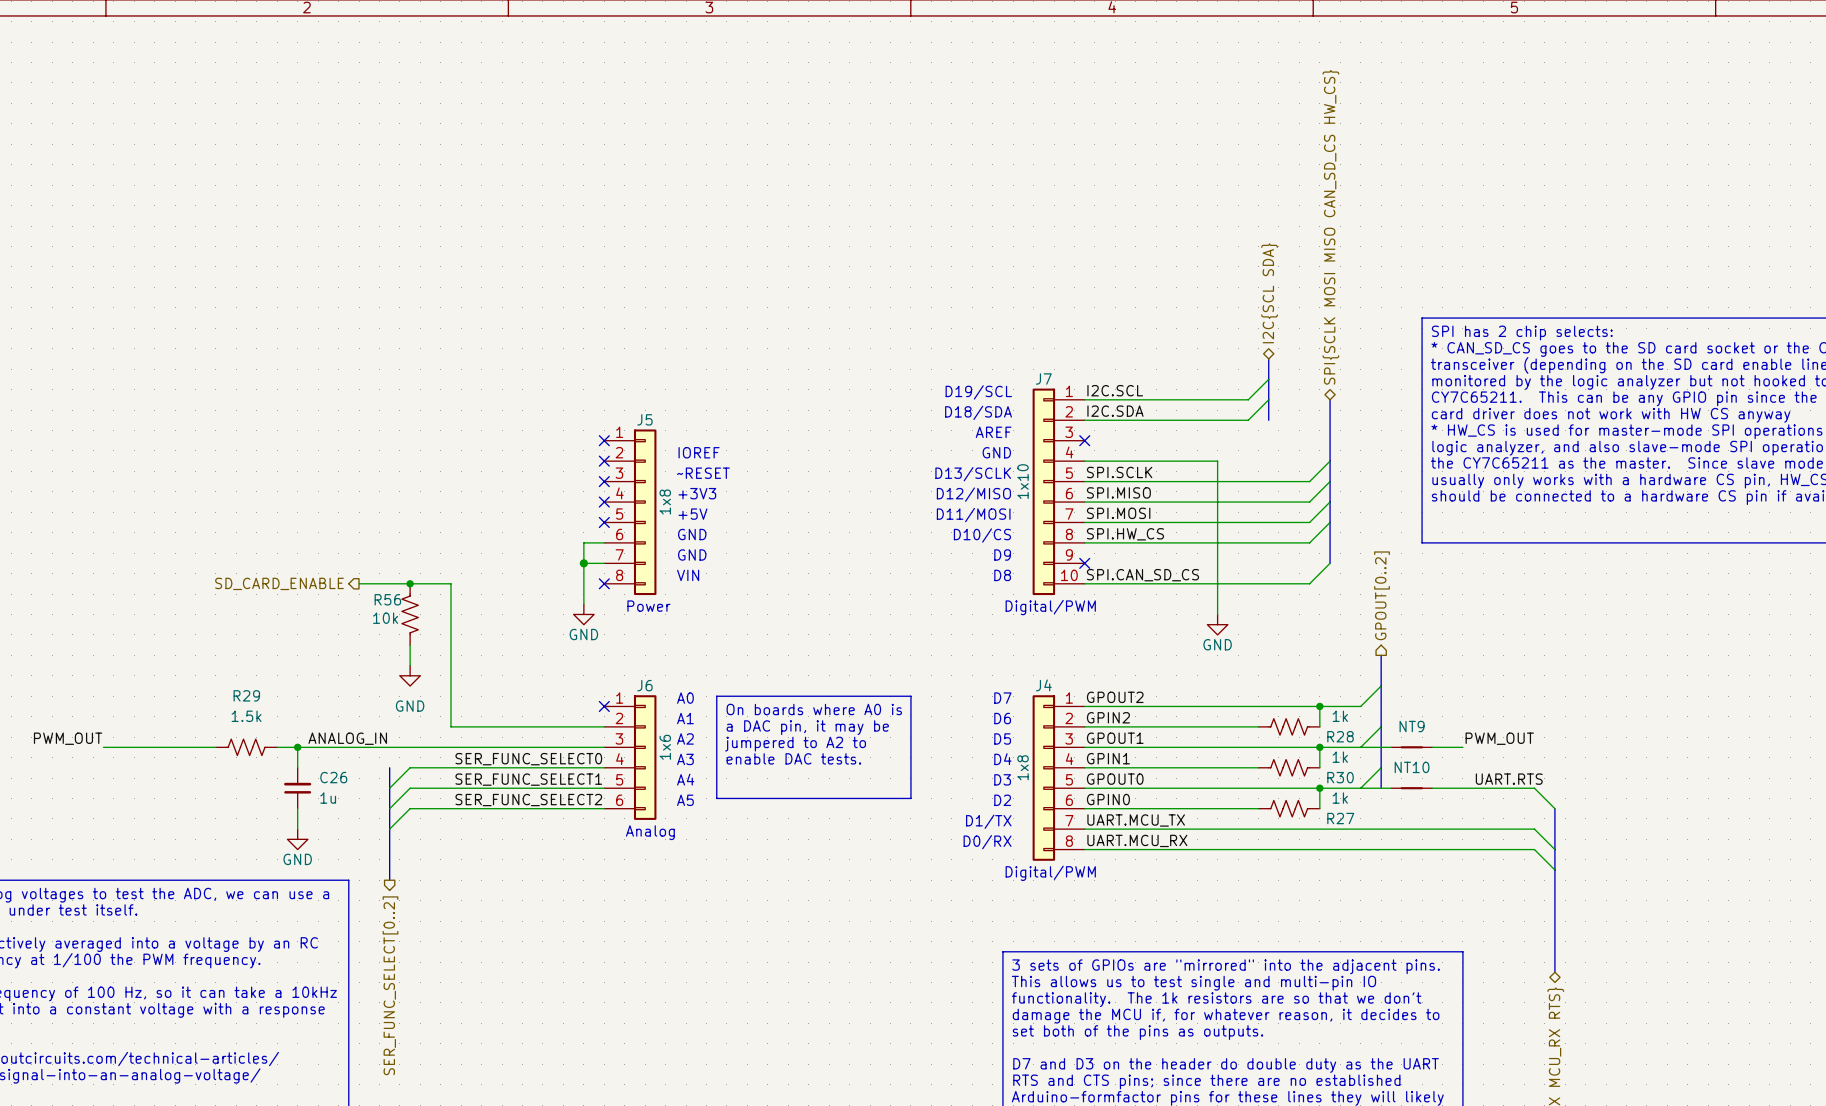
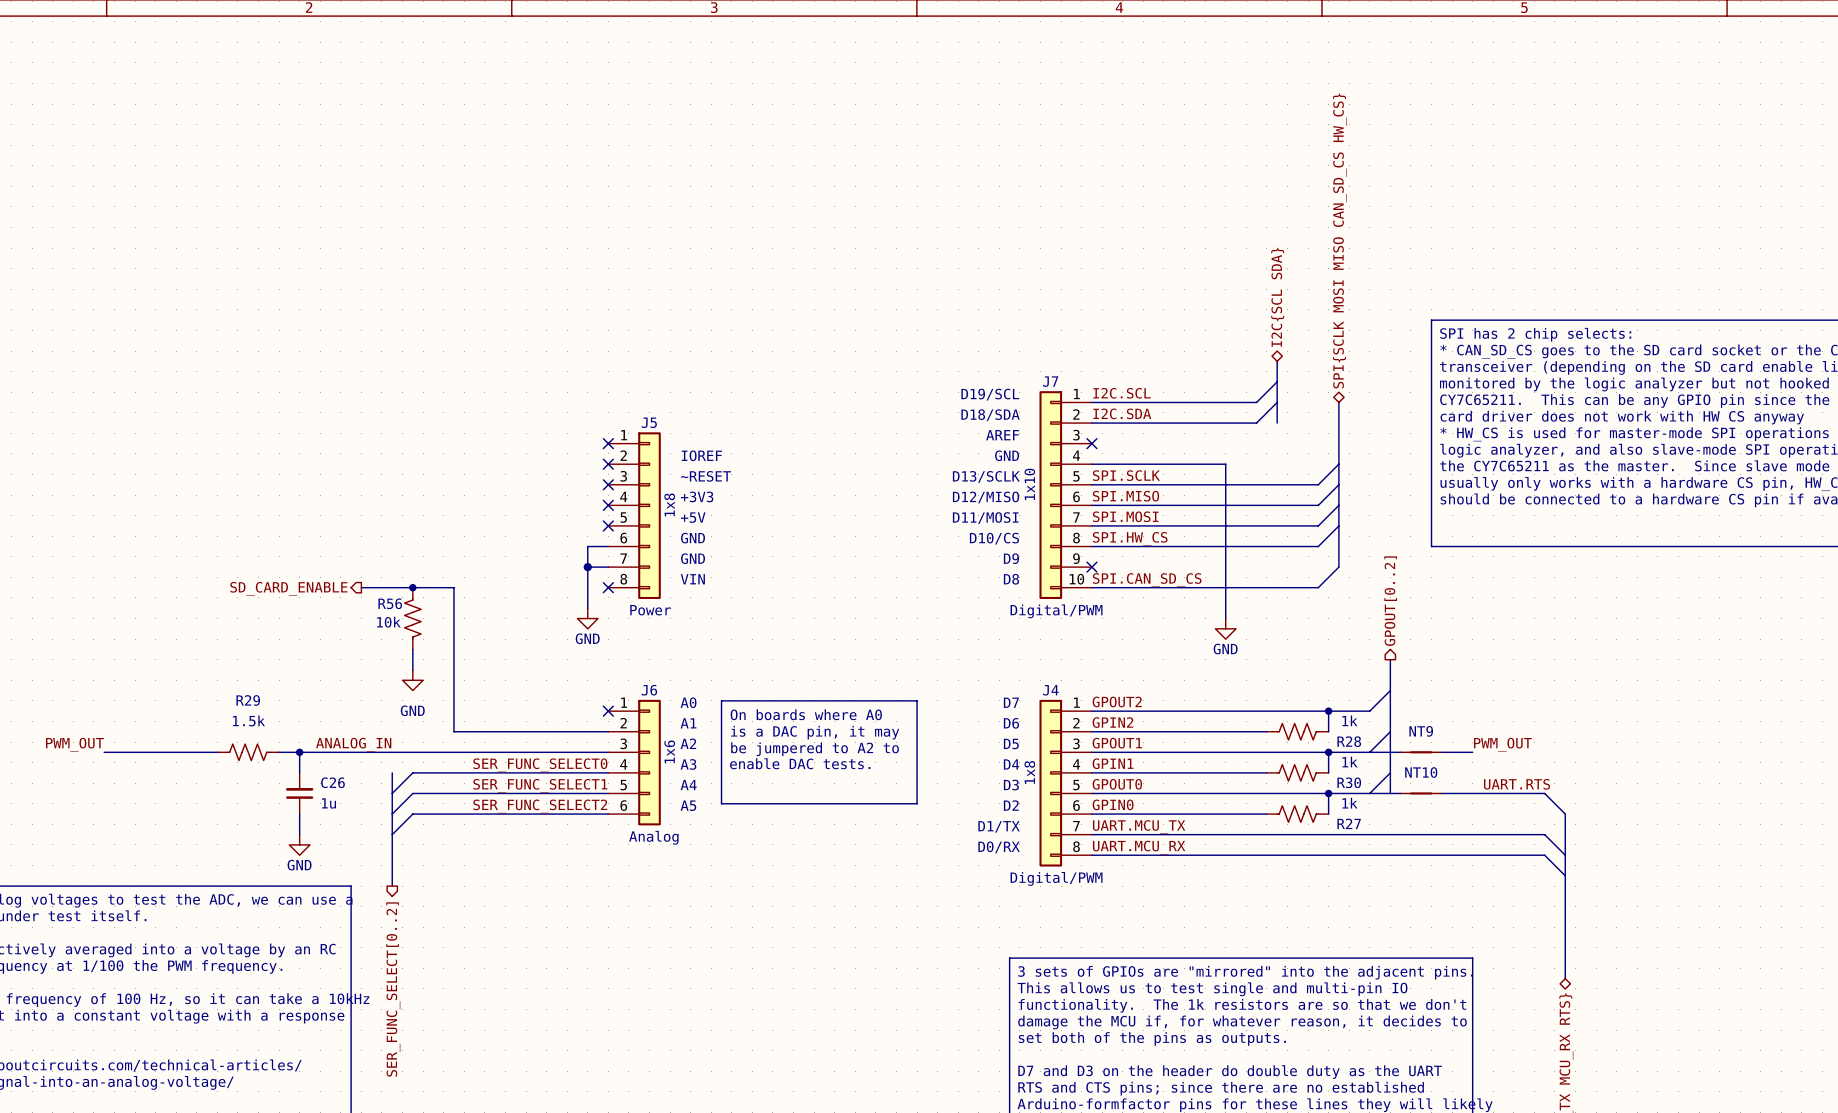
text: On boards where A0 is (814, 709) -> On boards where A0 (806, 714)
text: a DAC pin, it may be (807, 727) -> is a DAC pin, it may (815, 732)
text: jumpered to A2 to (795, 744) -> be jumpered to A2 to (815, 749)

